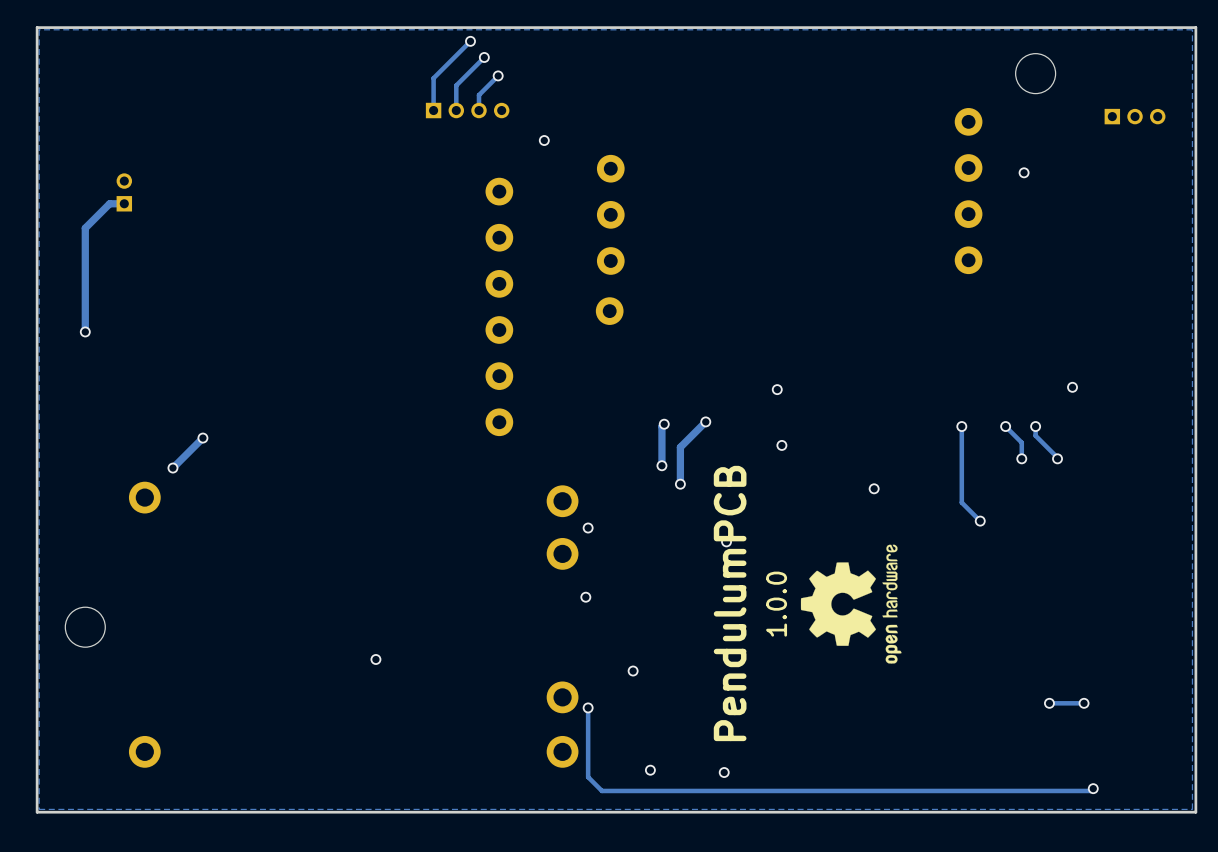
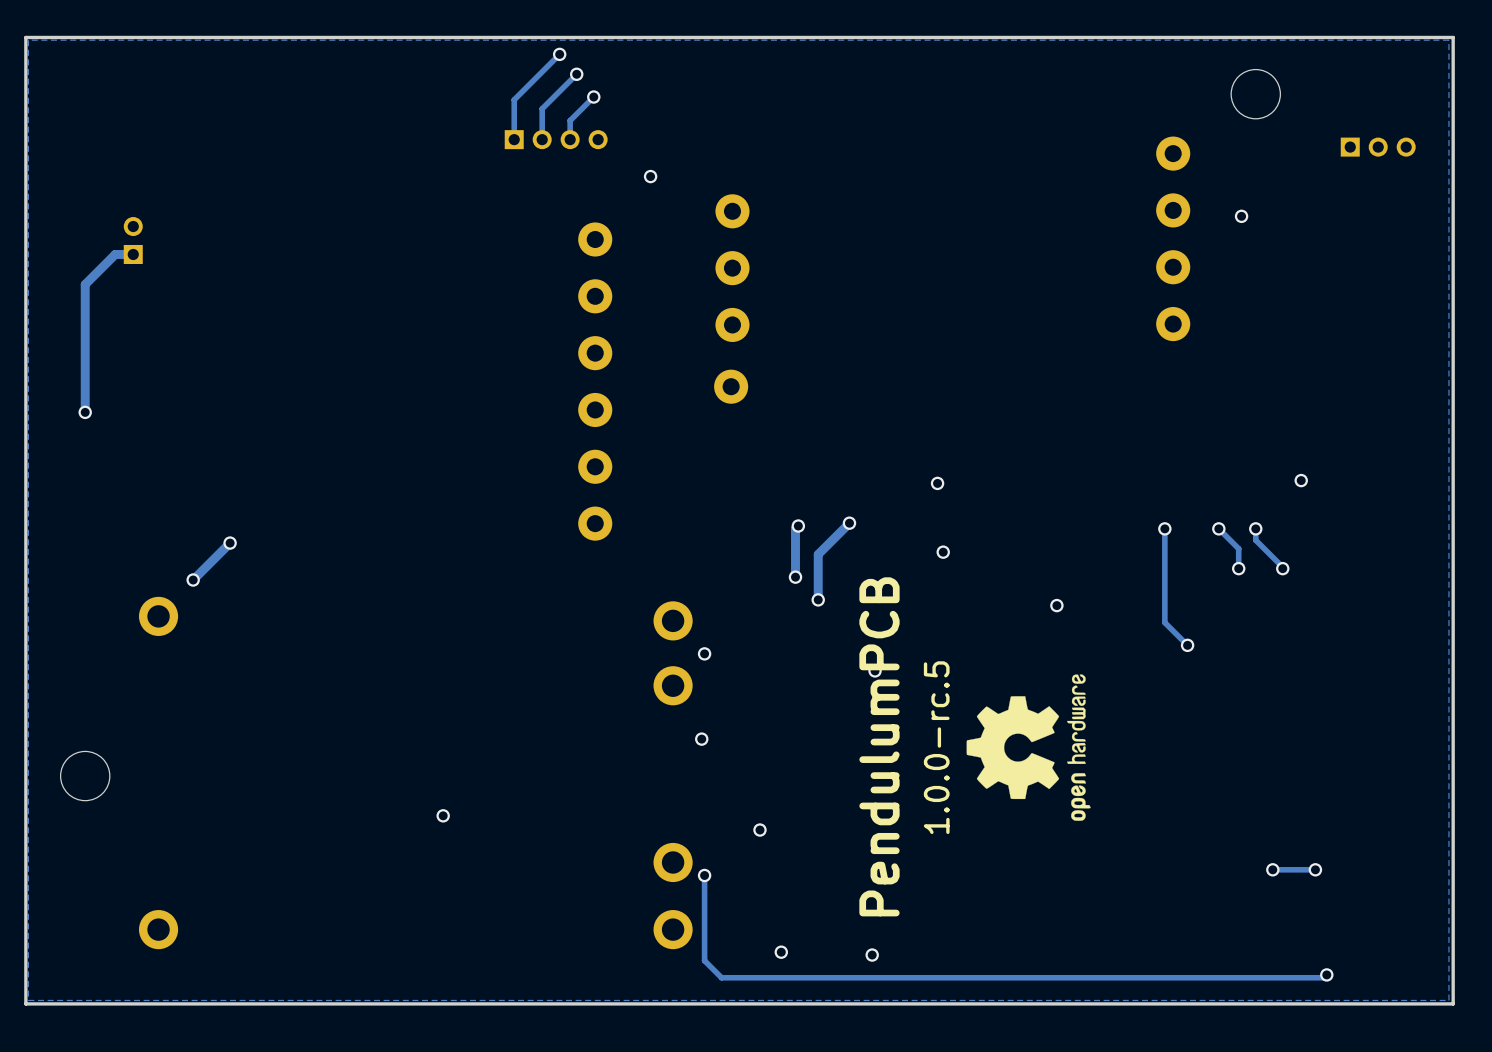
text: 1.0.0 (776, 604) -> 1.0.0-rc.5 (936, 747)

